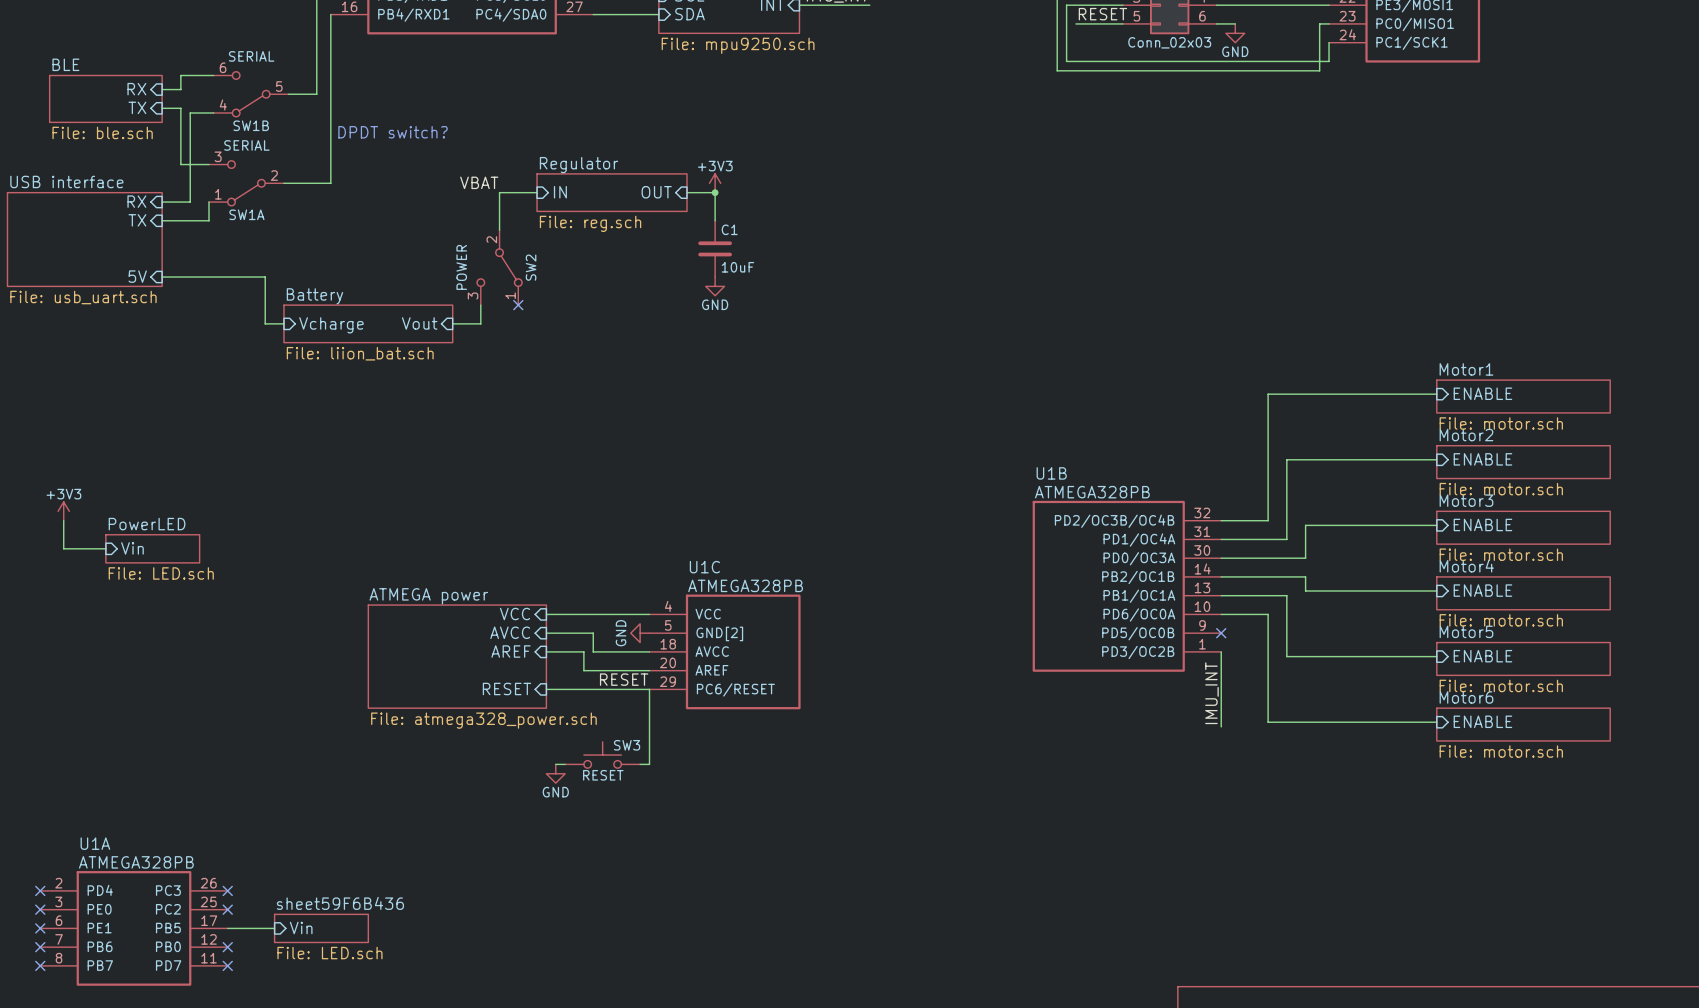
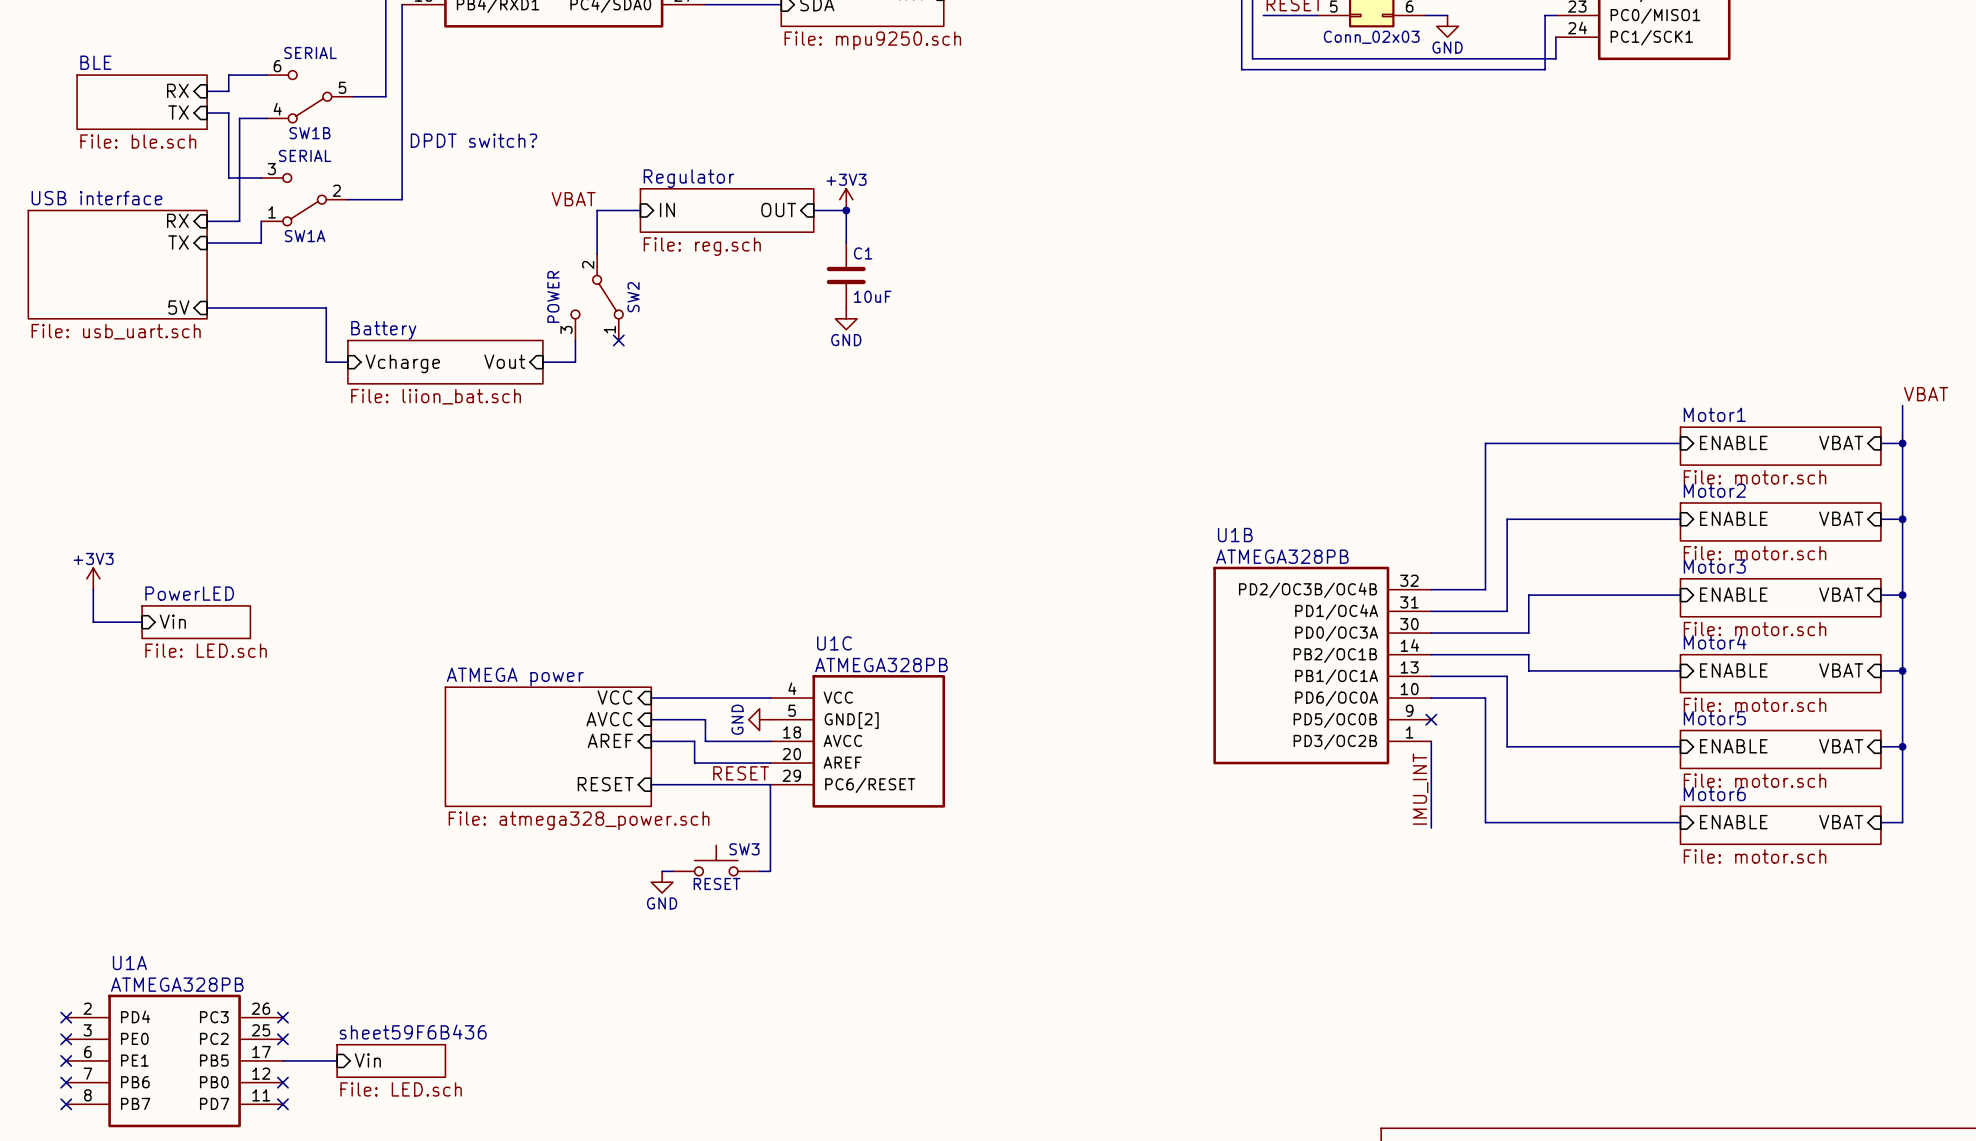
label: none -> VBAT (1926, 394)
wire: none -> (1902, 405) (1902, 822) (1880, 822)
sheet pin: none -> VBAT (1841, 442)
wire: none -> (1880, 443) (1902, 443)
junction: none -> (1902, 443)
sheet pin: none -> VBAT (1841, 518)
wire: none -> (1880, 519) (1902, 519)
junction: none -> (1902, 519)
sheet pin: none -> VBAT (1841, 594)
wire: none -> (1880, 595) (1902, 595)
junction: none -> (1902, 595)
sheet pin: none -> VBAT (1841, 670)
wire: none -> (1880, 670) (1902, 670)
junction: none -> (1902, 670)
sheet pin: none -> VBAT (1841, 746)
wire: none -> (1880, 746) (1902, 746)
junction: none -> (1902, 746)
sheet pin: none -> VBAT (1841, 822)

